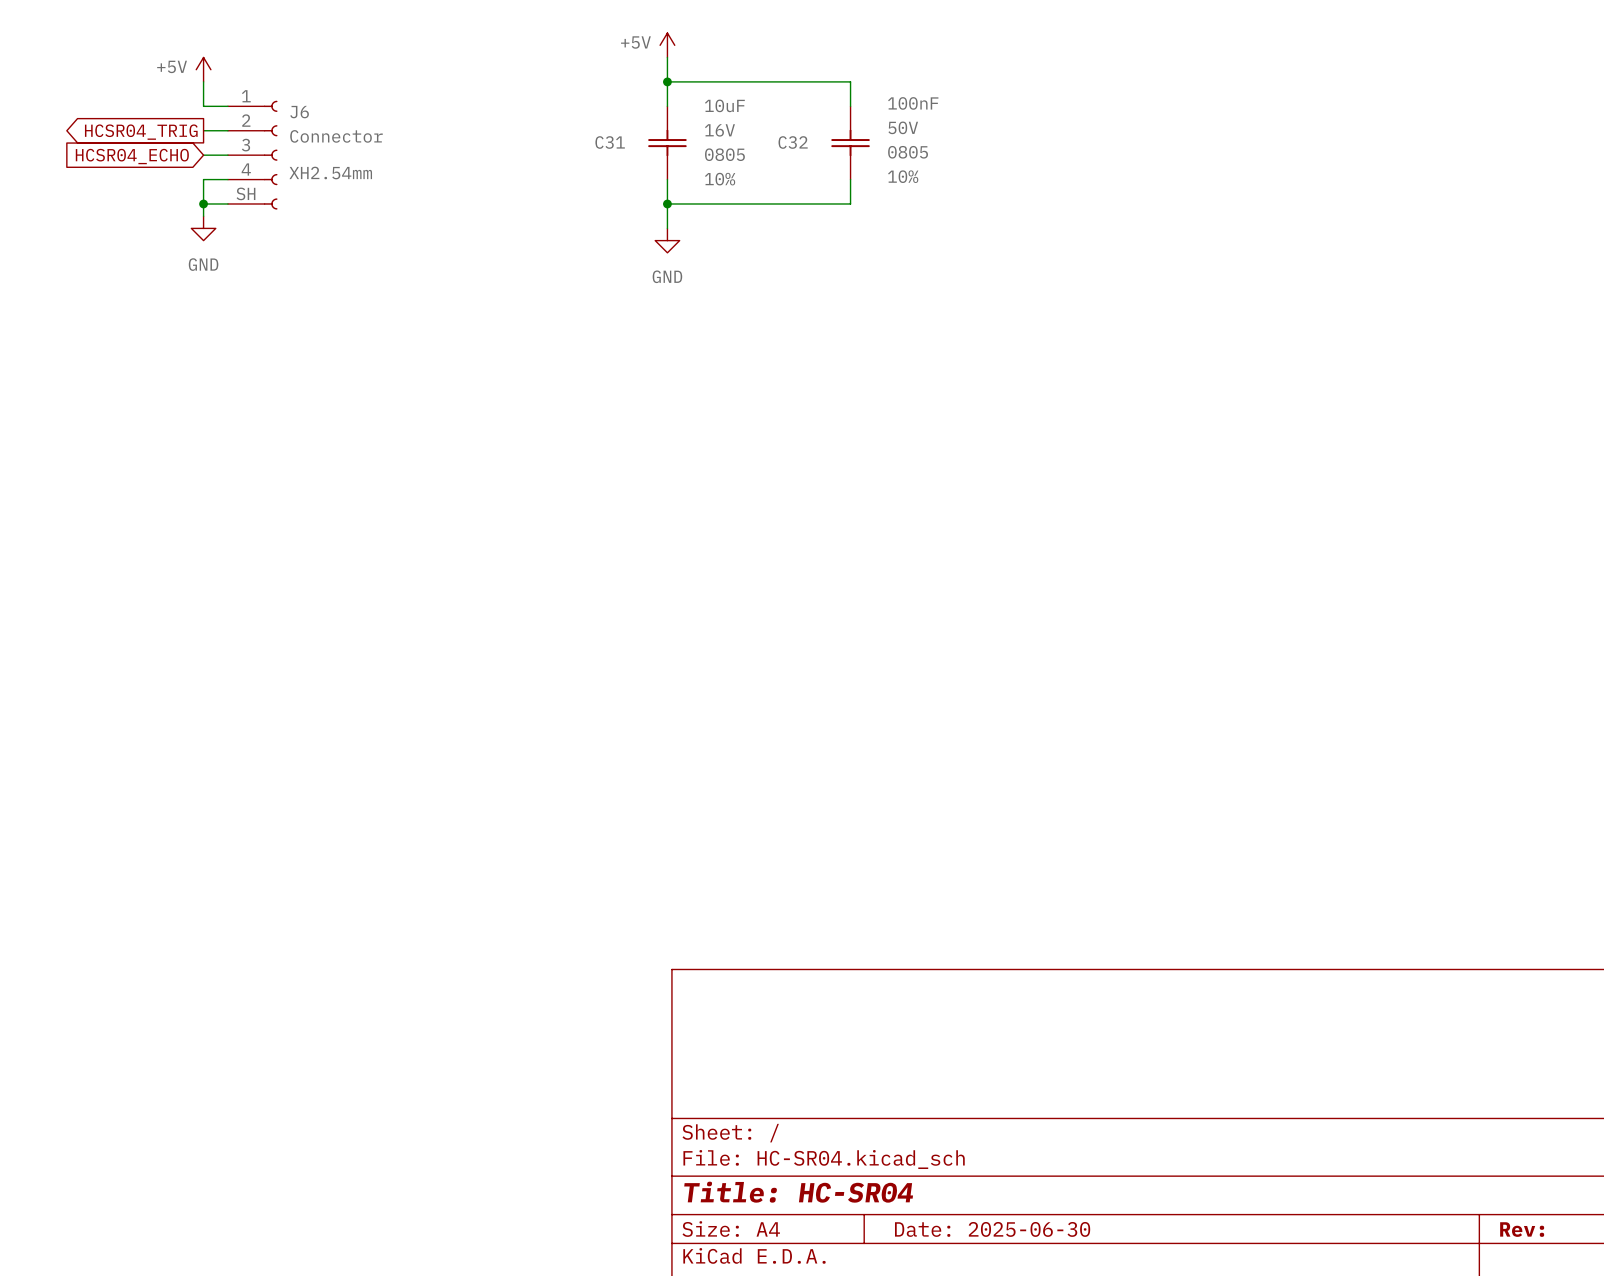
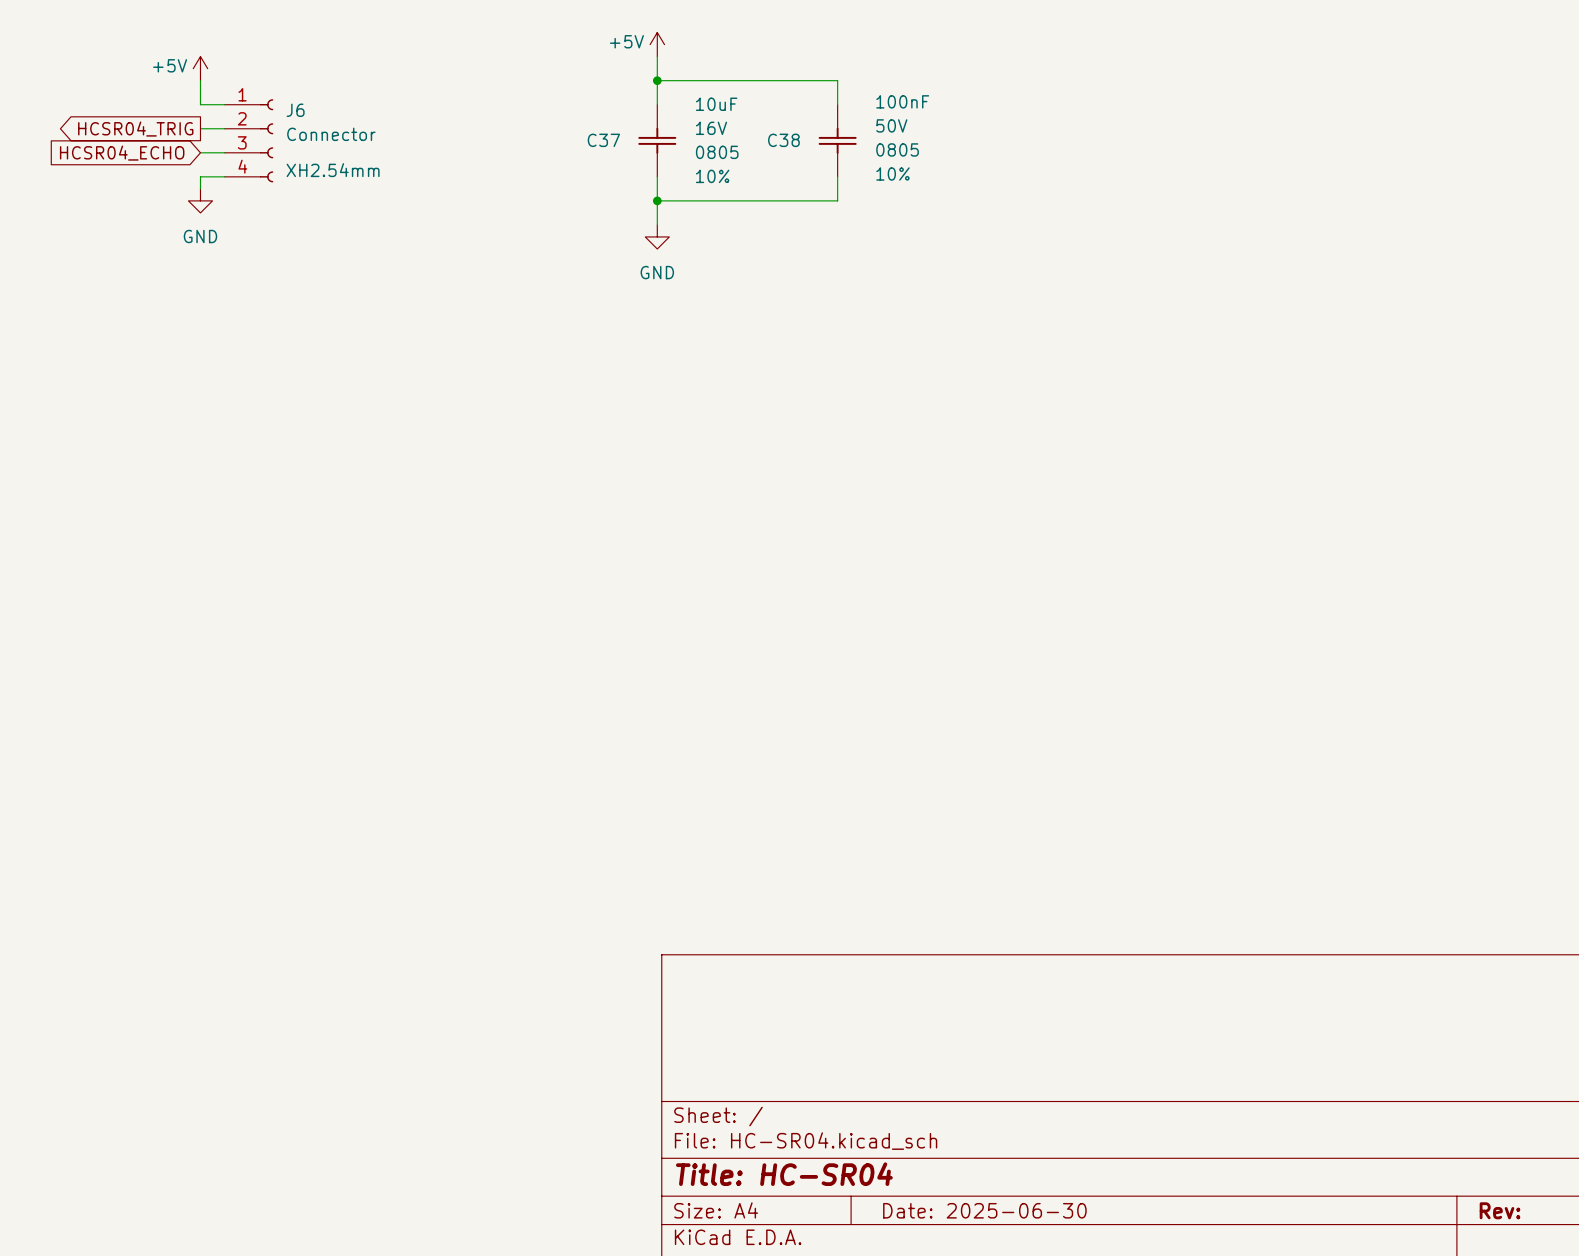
J6 symbol: [227, 100, 278, 210] -> [224, 99, 274, 183]
C31 name: C31 (610, 142) -> C37 (603, 140)
C32 name: C32 (793, 142) -> C38 (783, 140)
wire: (203, 203) (227, 203) -> none
junction: (203, 203) -> none
power symbol position: GND (203, 228) -> GND (200, 200)

